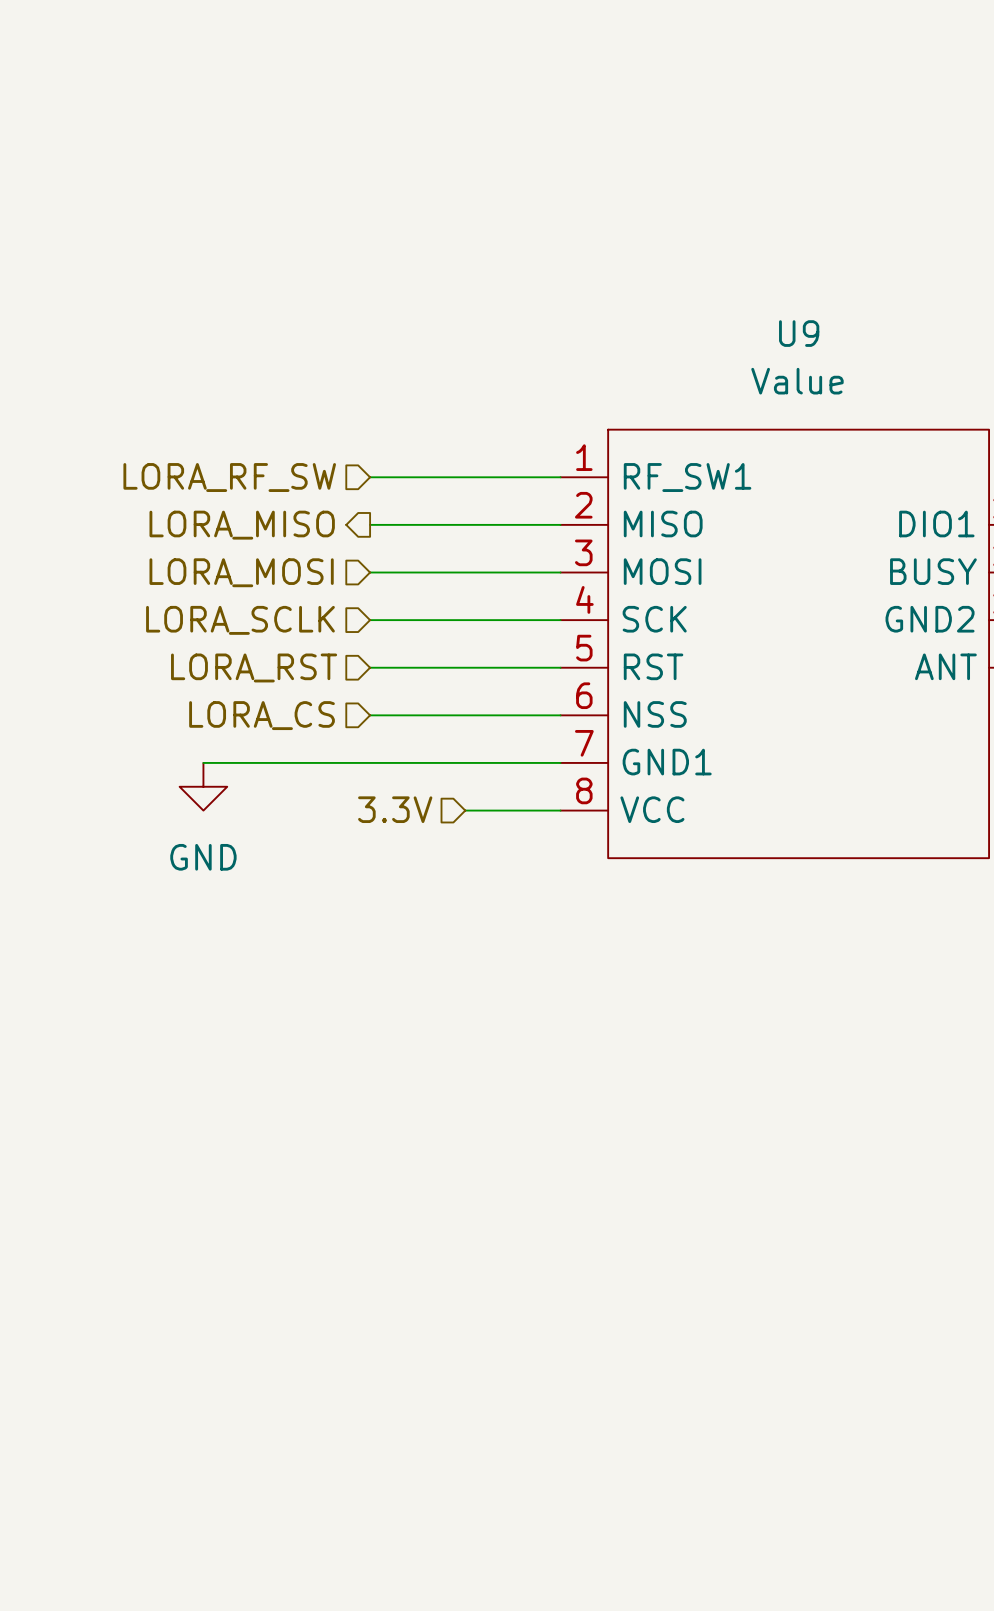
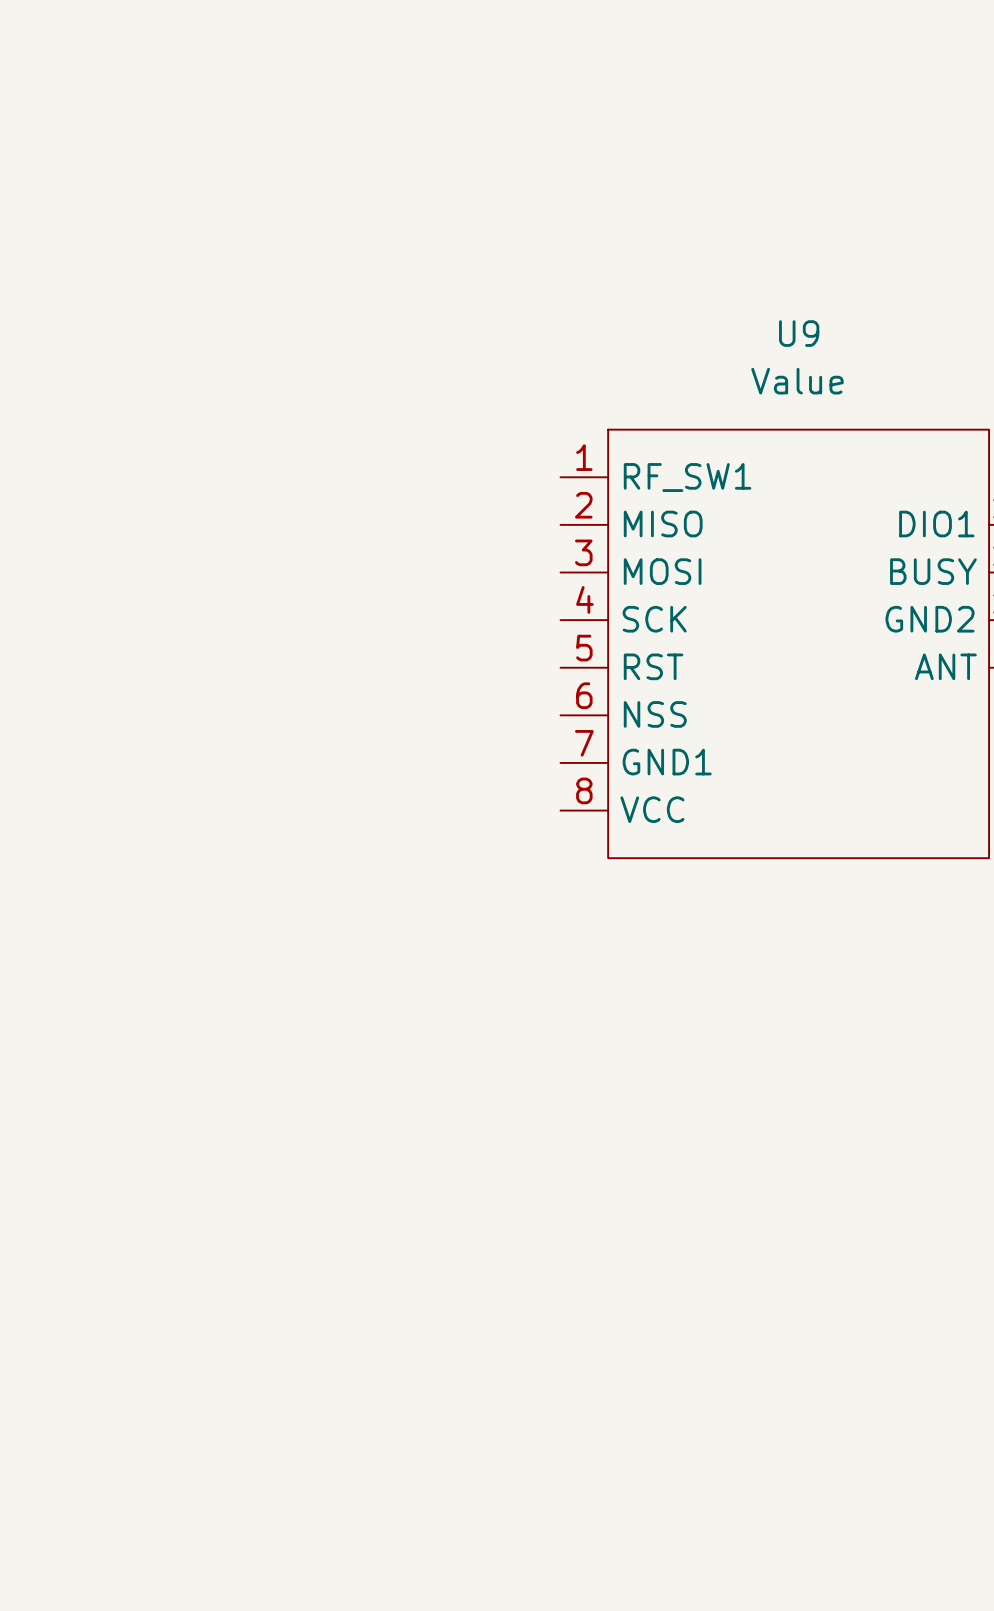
hierarchical label: LORA_RF_SW (229, 477) -> none
wire: (370, 477) (560, 477) -> none
wire: (370, 524) (560, 524) -> none
hierarchical label: LORA_MISO (242, 525) -> none
hierarchical label: LORA_MOSI (241, 572) -> none
wire: (370, 572) (560, 572) -> none
hierarchical label: LORA_SCLK (240, 620) -> none
wire: (370, 620) (560, 620) -> none
hierarchical label: LORA_RST (254, 667) -> none
wire: (370, 667) (560, 667) -> none
hierarchical label: LORA_CS (262, 715) -> none
wire: (370, 715) (560, 715) -> none
wire: (203, 762) (560, 762) -> none
power symbol: GND (203, 786) -> none
hierarchical label: 3.3V (395, 809) -> none
wire: (465, 810) (560, 810) -> none

